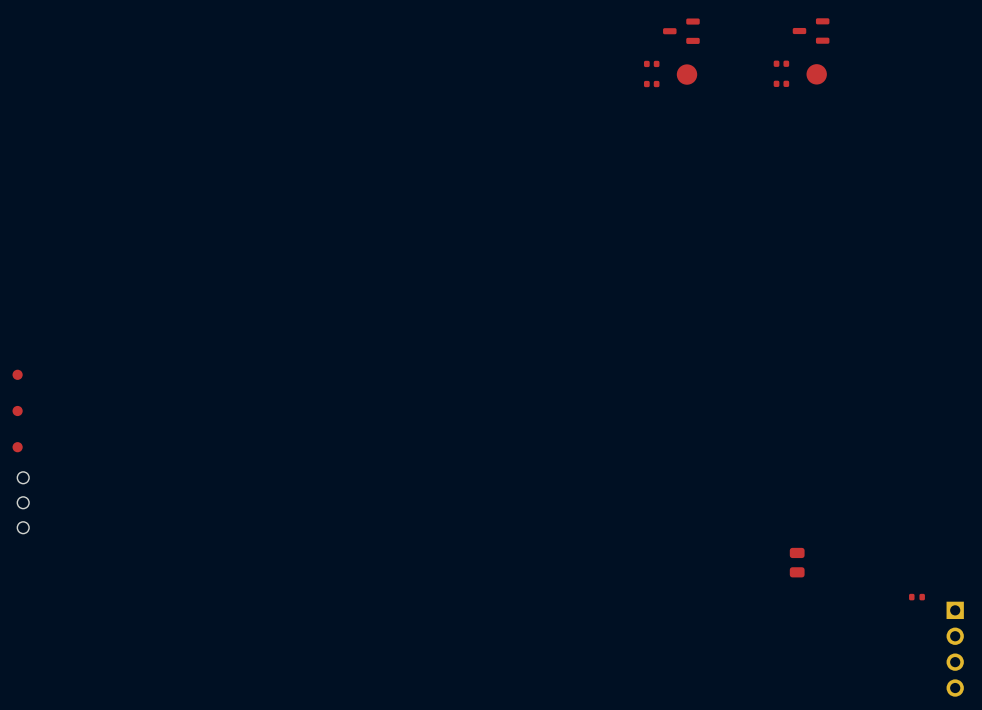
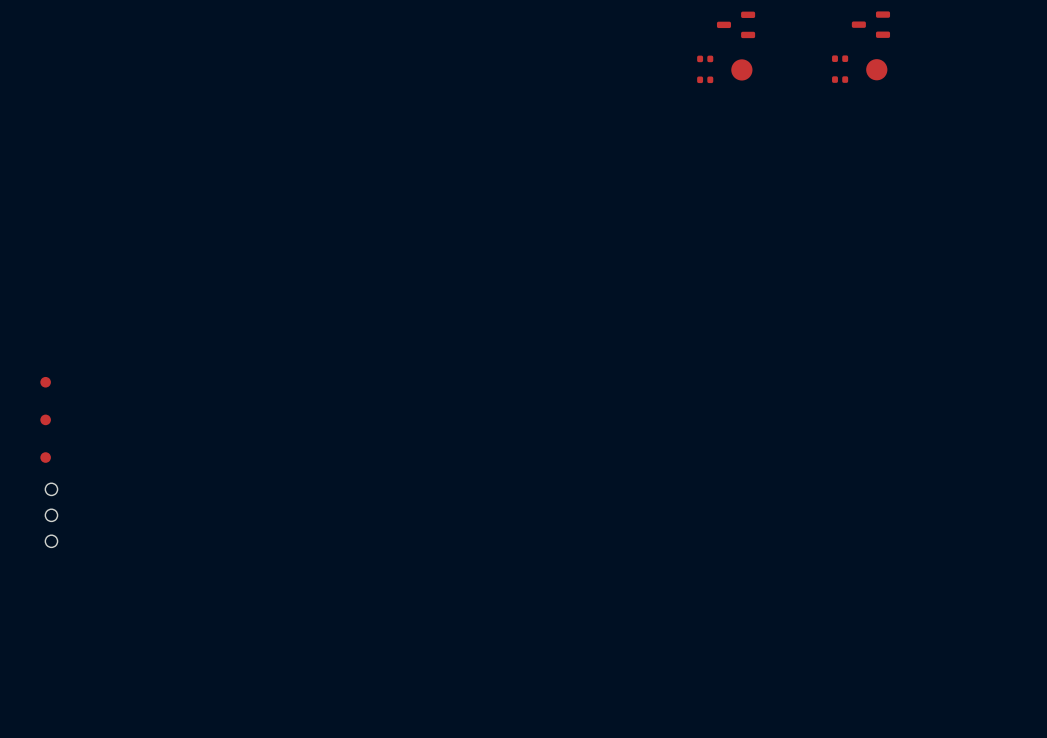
part: (797, 562) -> none
part: (916, 597) -> none
part: (955, 649) -> none

